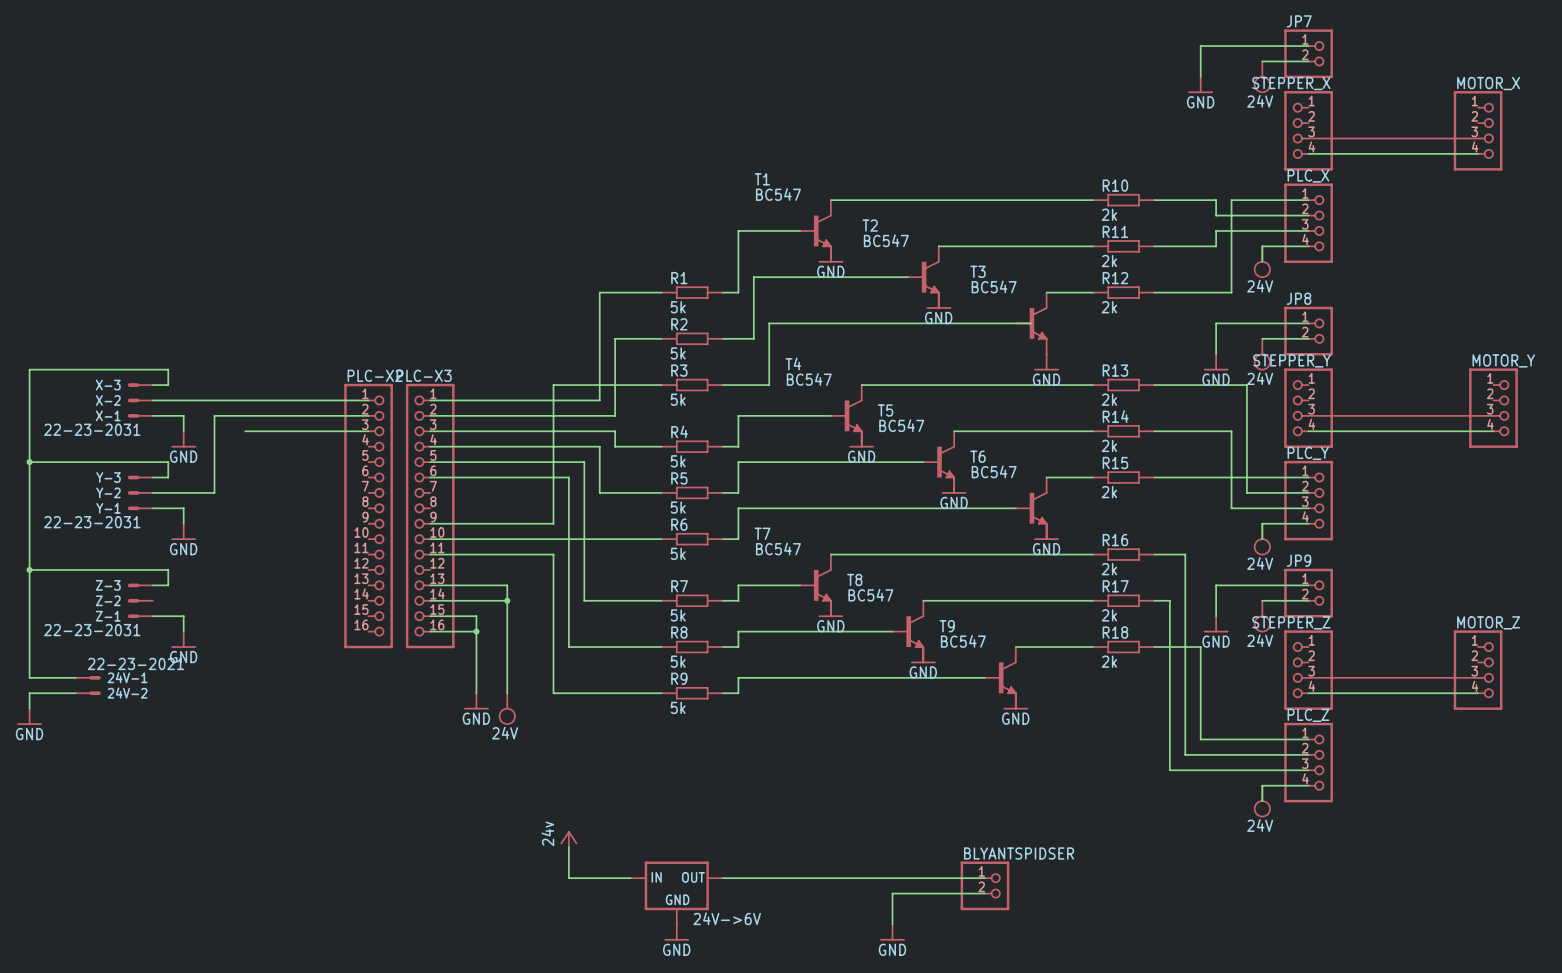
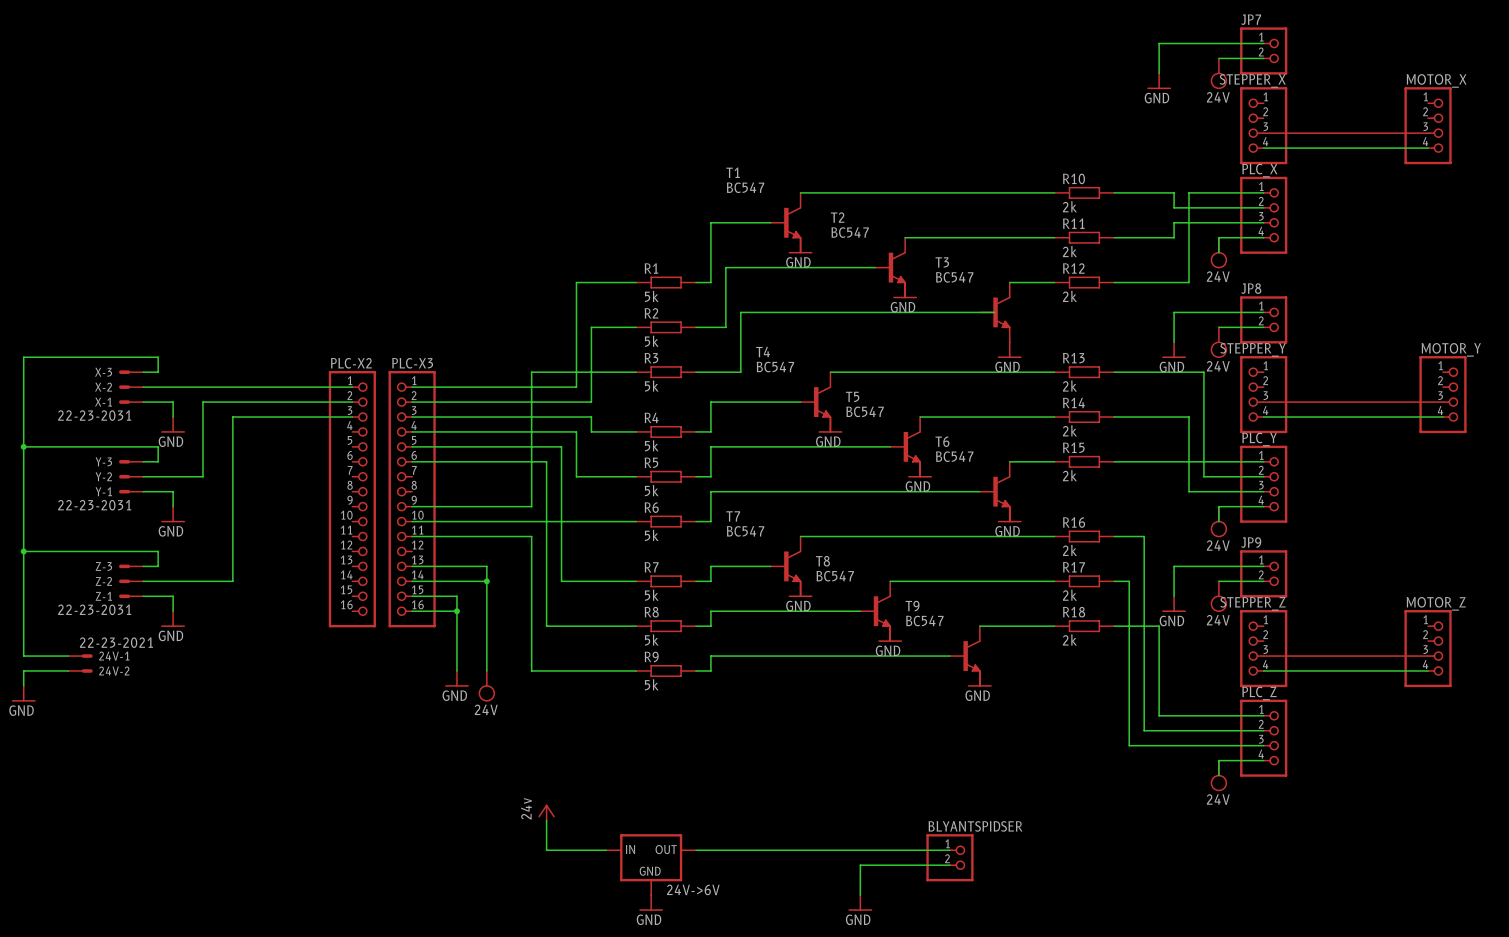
wire: none -> (232, 417) (232, 581) (143, 581)

